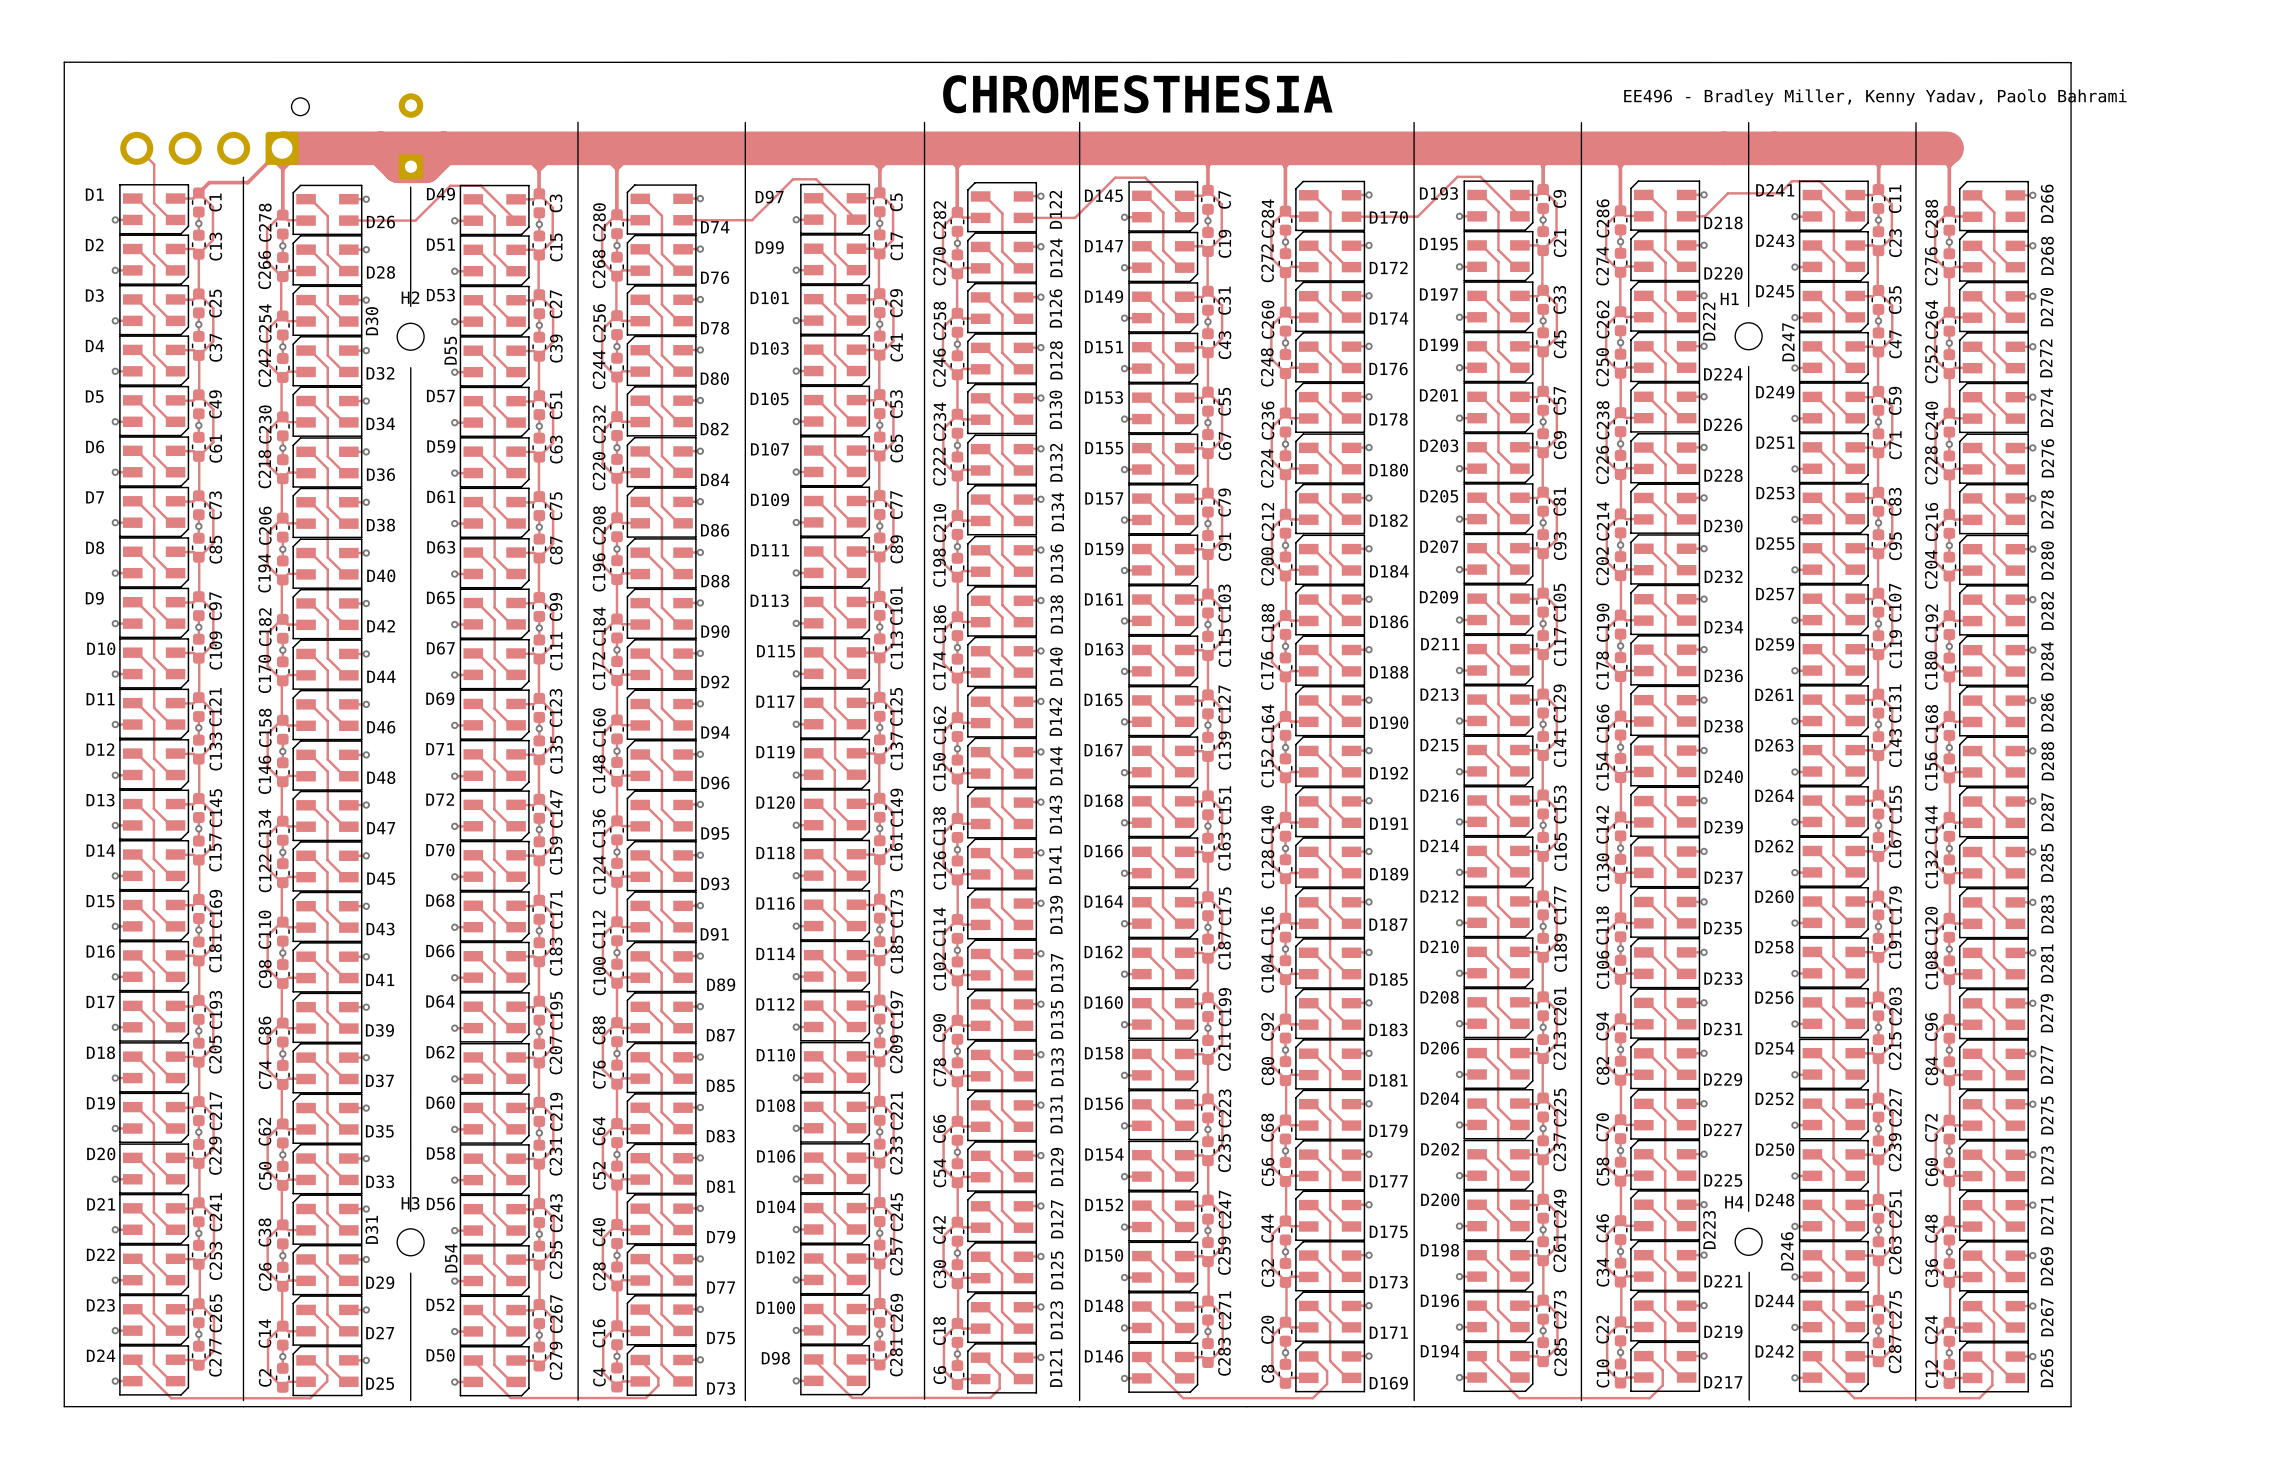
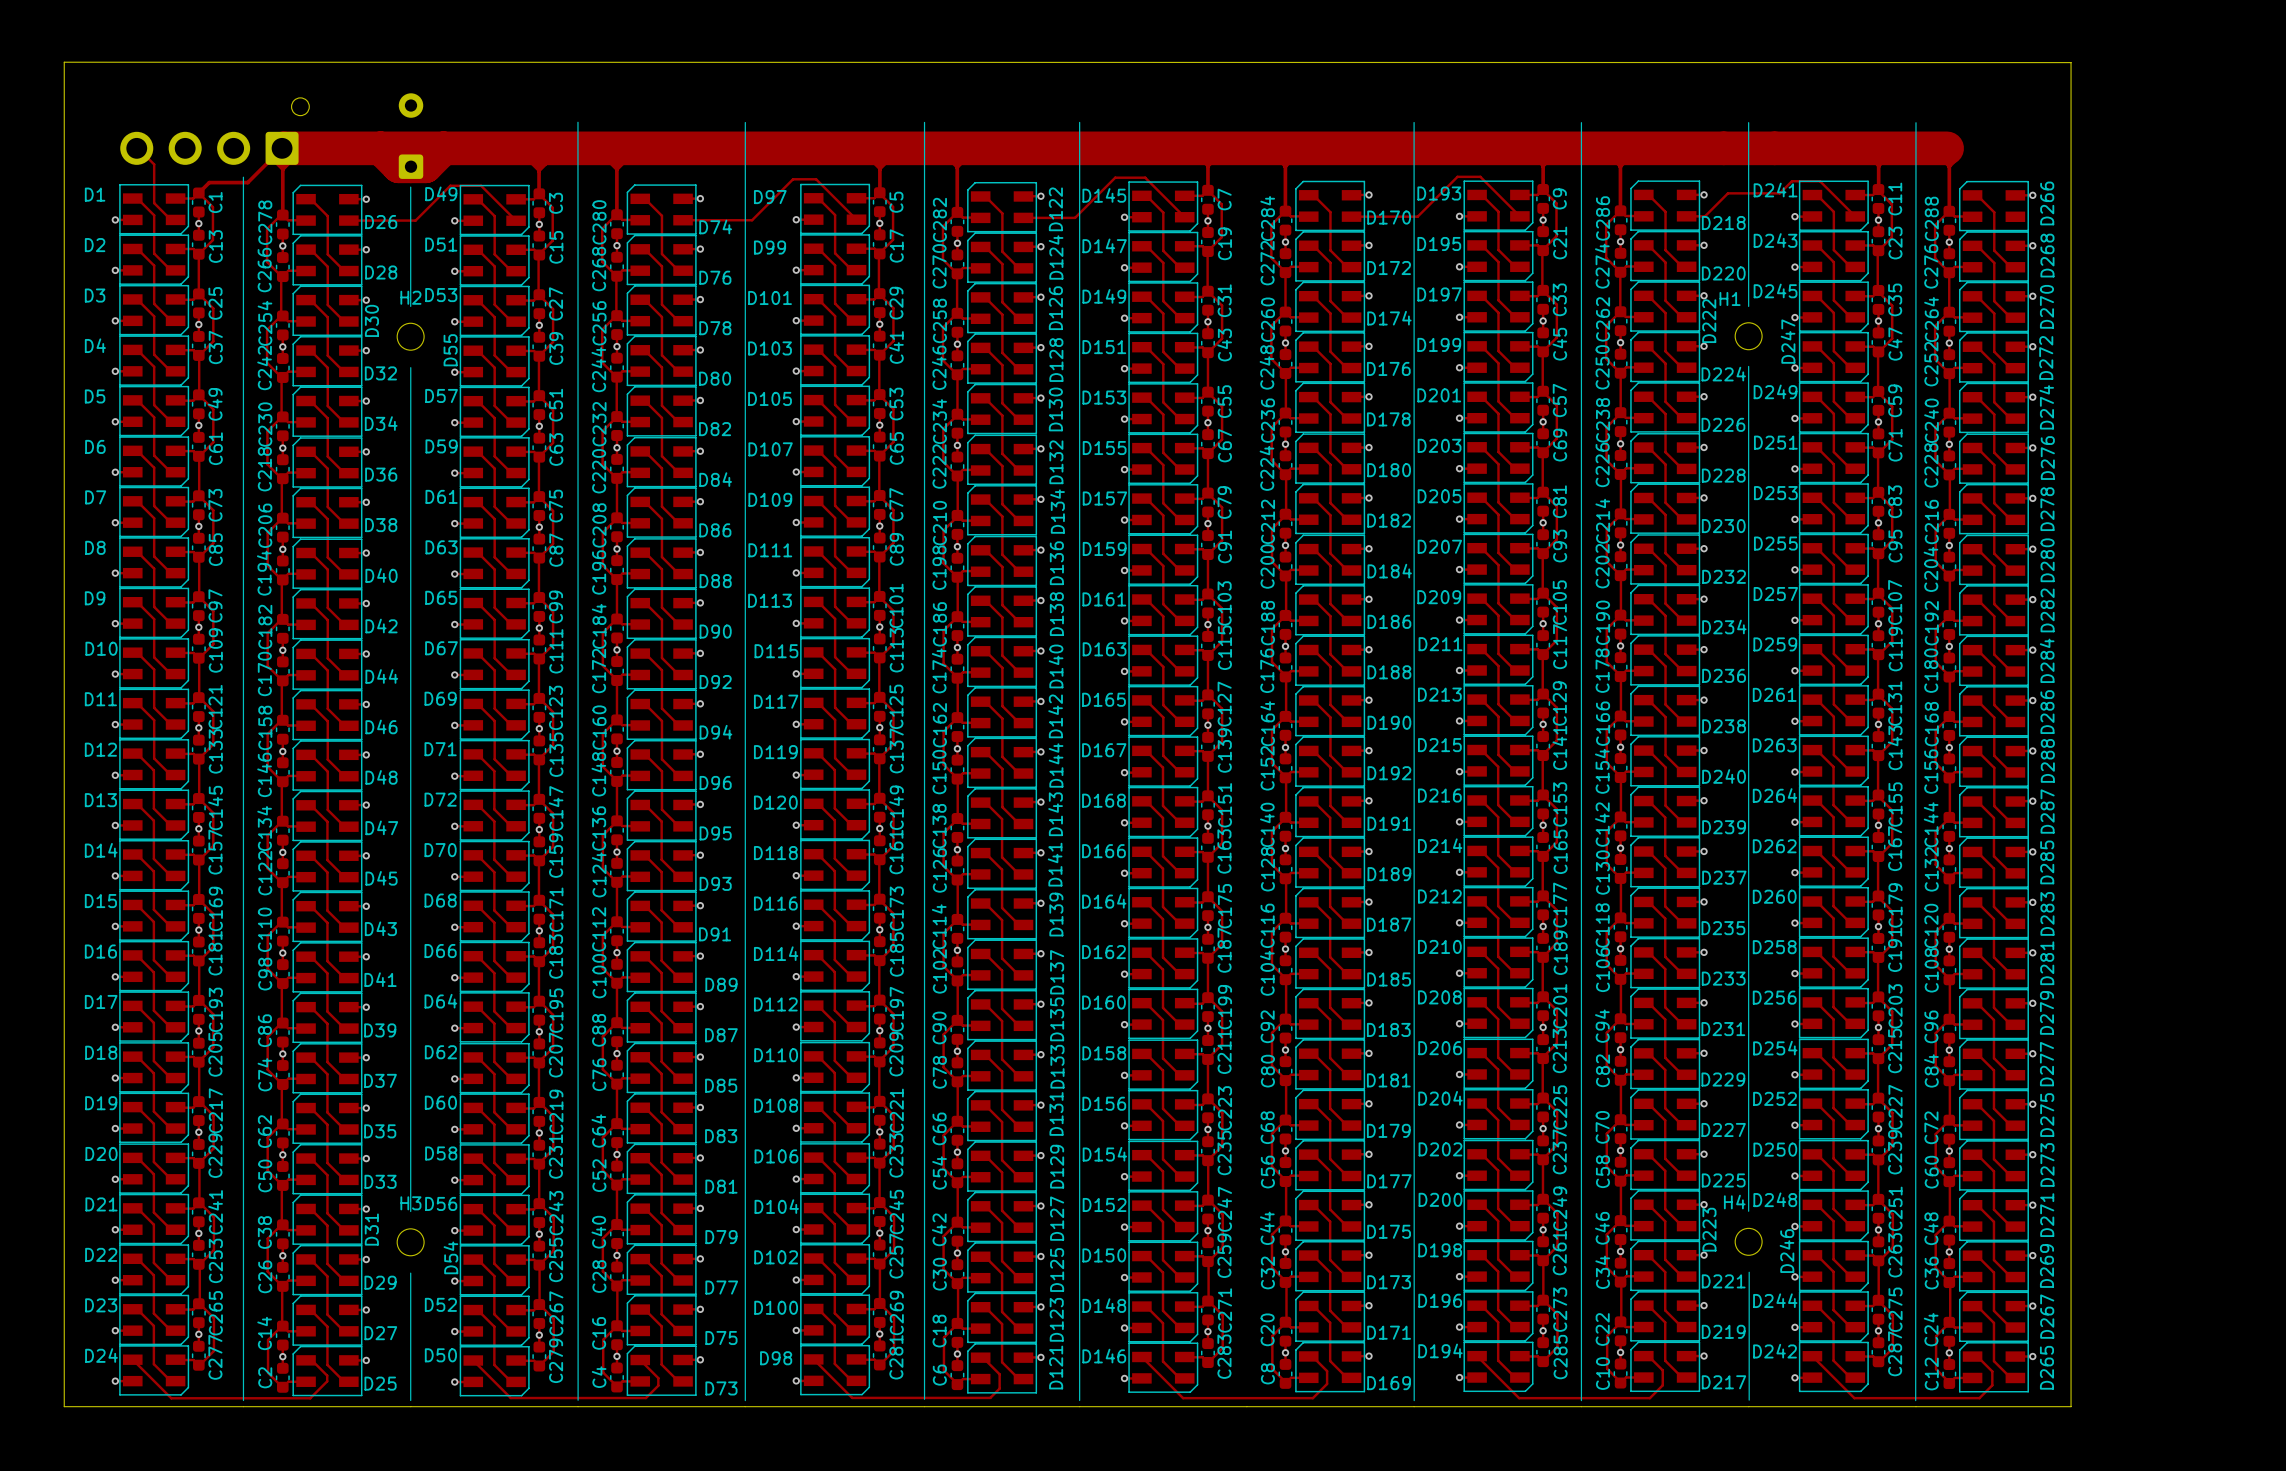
text: CHROMESTHESIA (1137, 94) -> none
text: EE496 - Bradley Miller, Kenny Yadav, Paolo Bahrami (1875, 97) -> none

